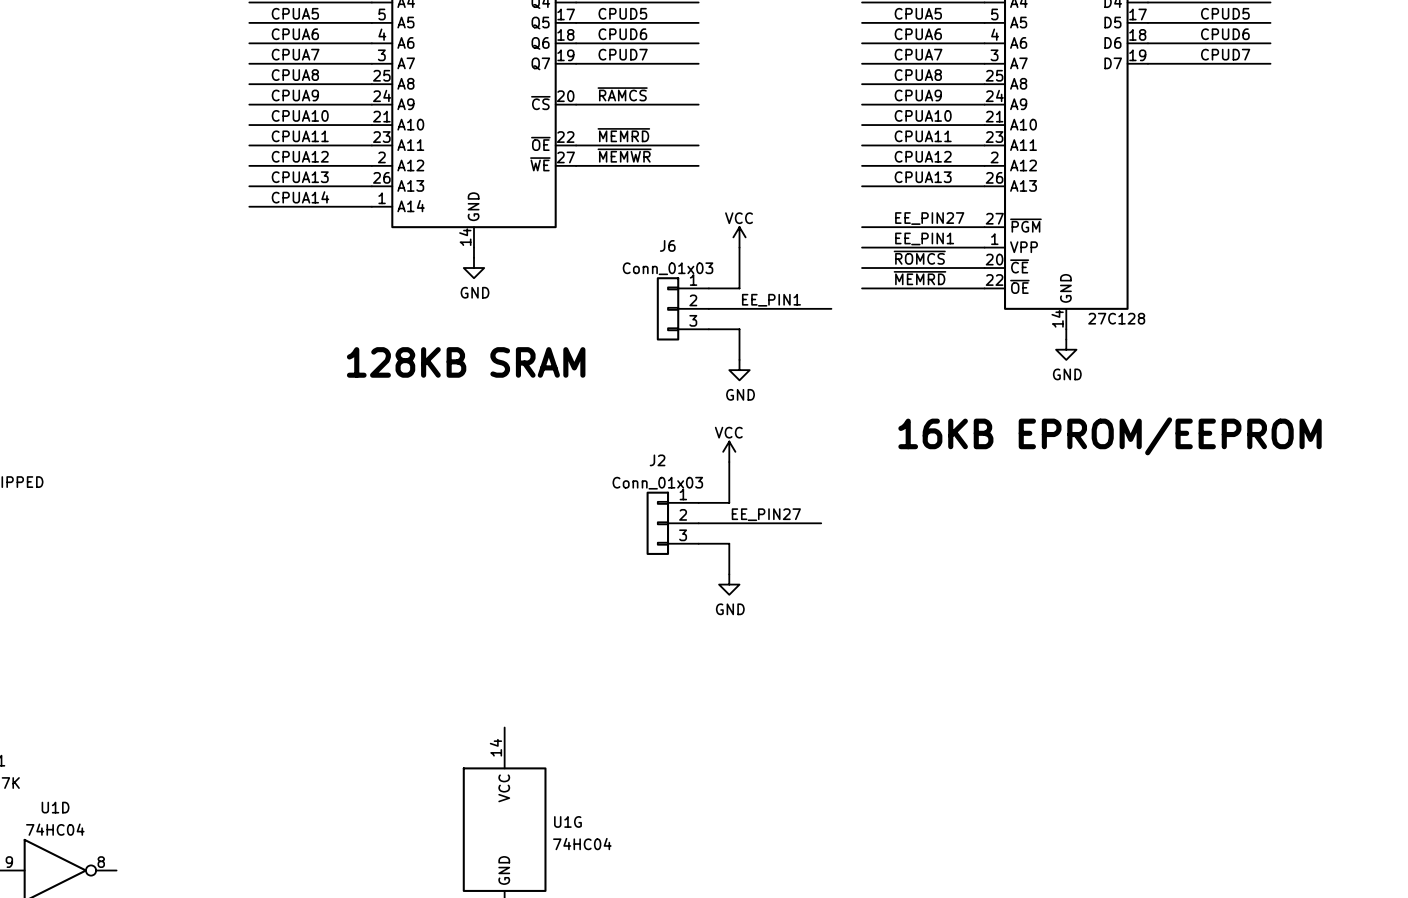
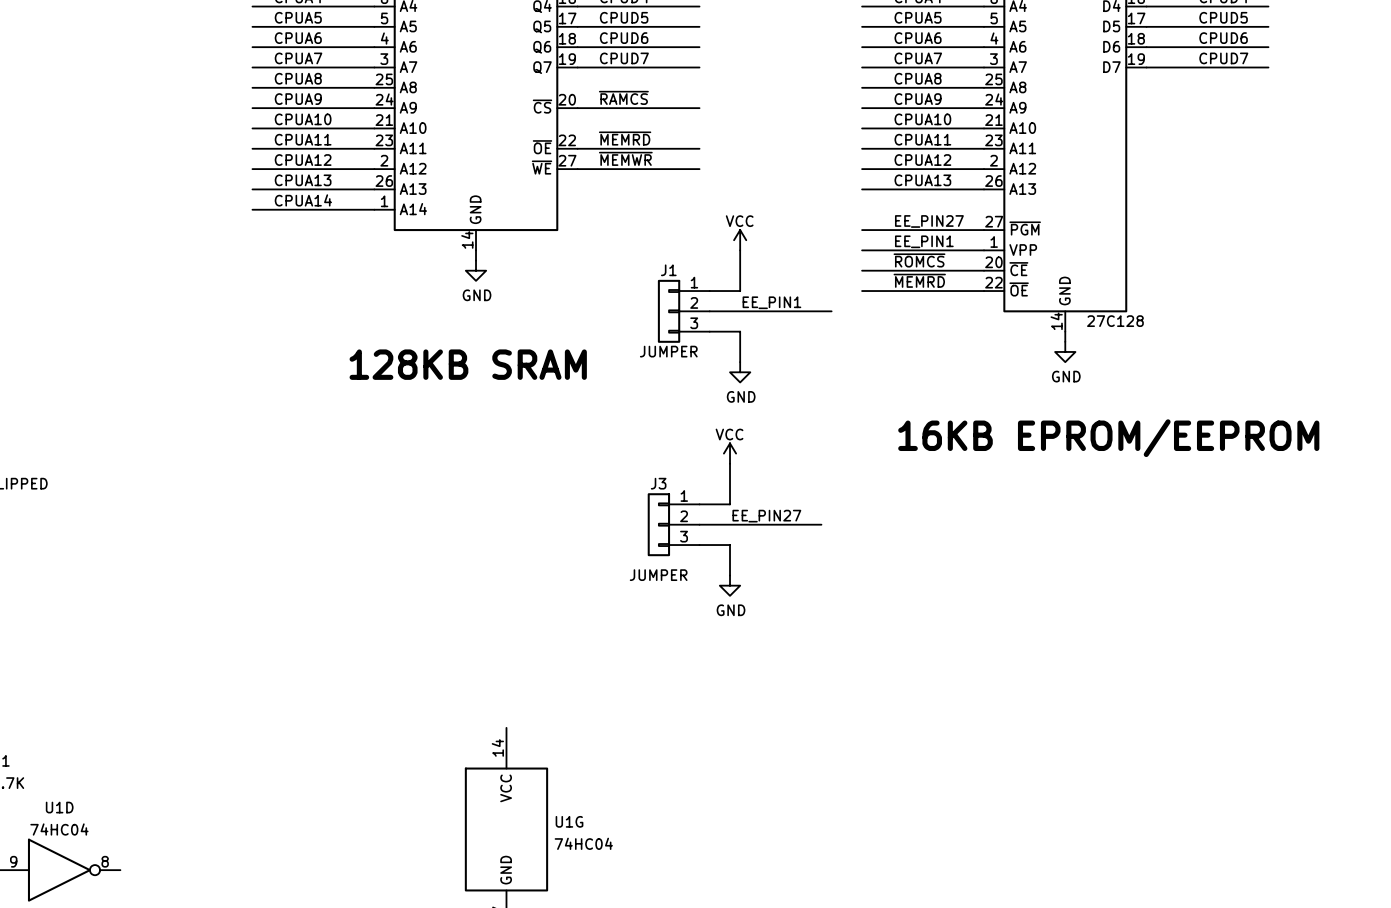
J6 name: J6 (667, 245) -> J1 (668, 270)
J6 value: Conn_01x03 (668, 268) -> JUMPER (668, 351)
J2 name: J2 (657, 460) -> J3 (658, 483)
J2 value: Conn_01x03 (657, 483) -> JUMPER (658, 575)

